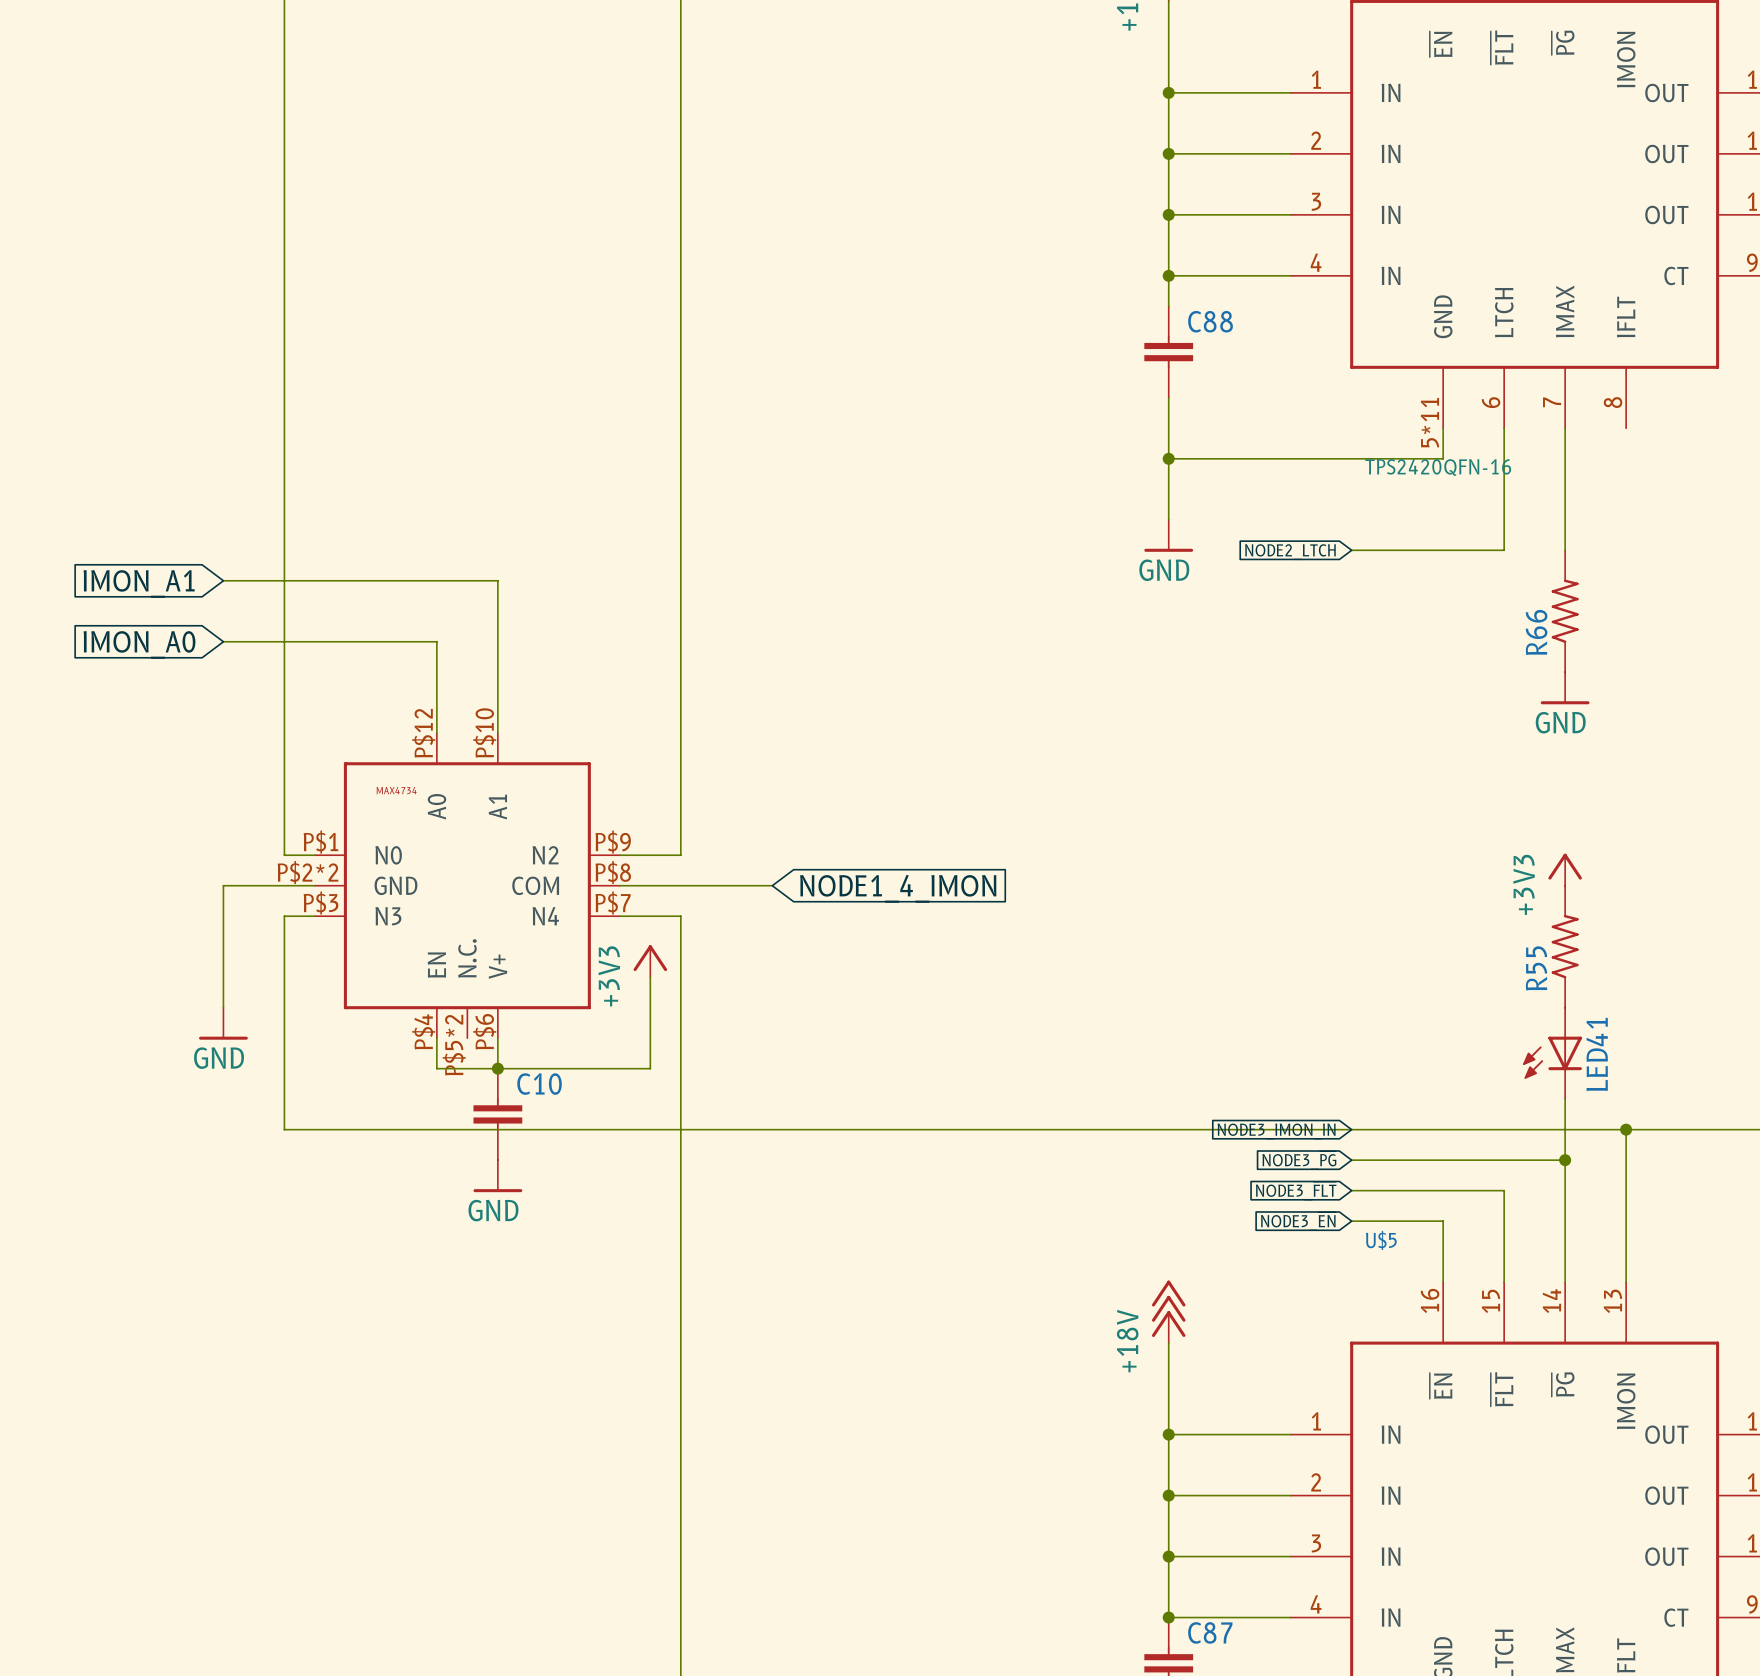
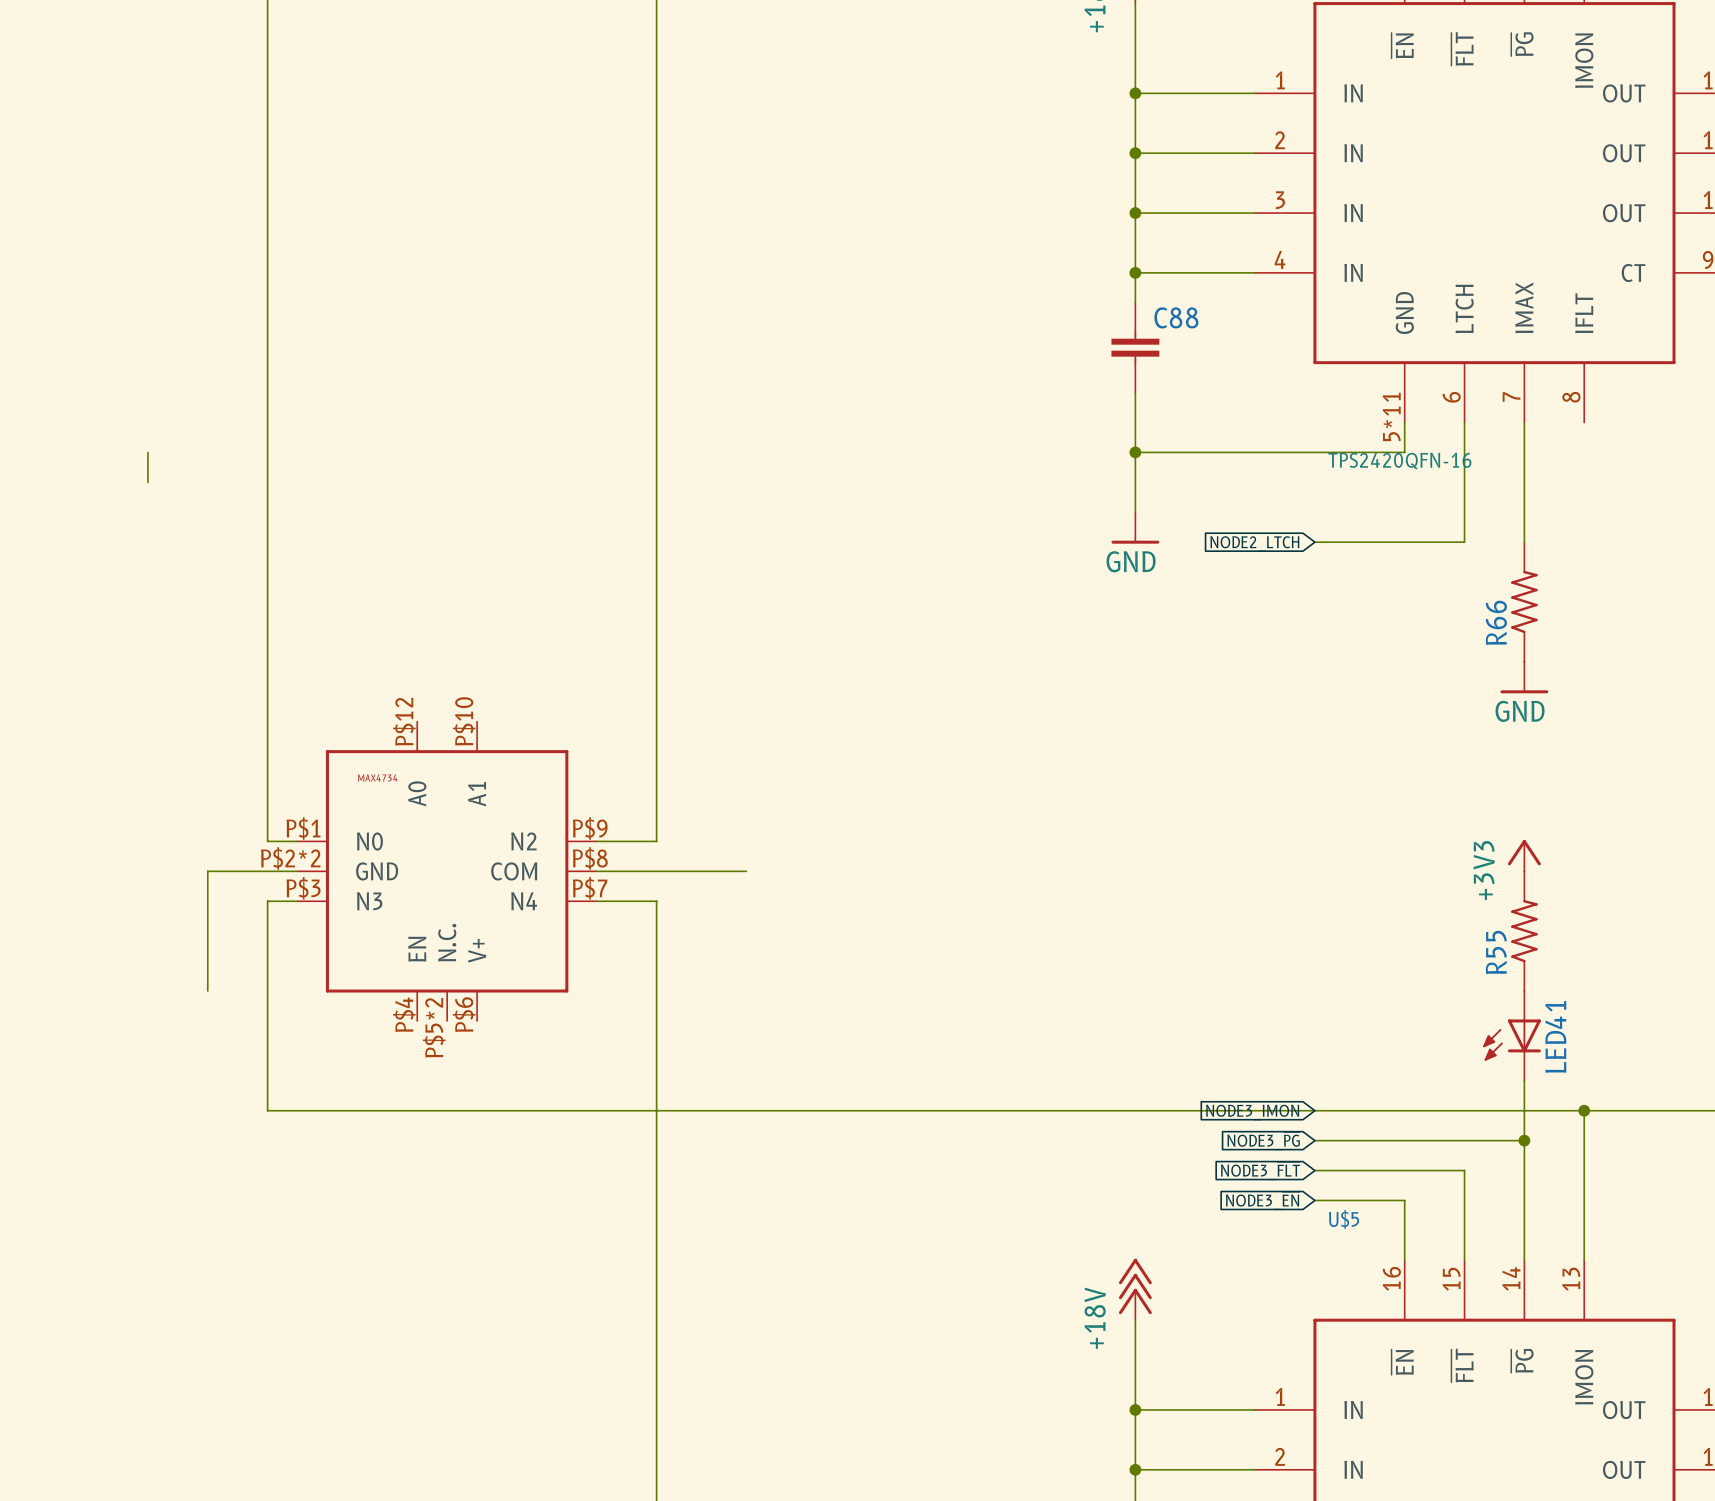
wire: none -> (147, 452) (147, 482)
wire: (223, 580) (497, 580) (497, 733) -> none
global label: IMON_A1 (139, 583) -> none
wire: (223, 641) (436, 641) (436, 733) -> none
global label: IMON_A0 (139, 644) -> none
global label: NODE1_4_IMON (898, 888) -> none
power symbol: +3V3 (650, 961) -> none
wire: (650, 977) (650, 1068) (436, 1068) (436, 1038) -> none
power symbol: GND (223, 1023) -> none
wire: (497, 1038) (497, 1068) -> none
junction: (497, 1068) -> none
C10: (497, 1114) -> none
global label: NODE3_IMON_IN (1276, 1131) -> NODE3_IMON (1252, 1112)
power symbol: GND (497, 1176) -> none

